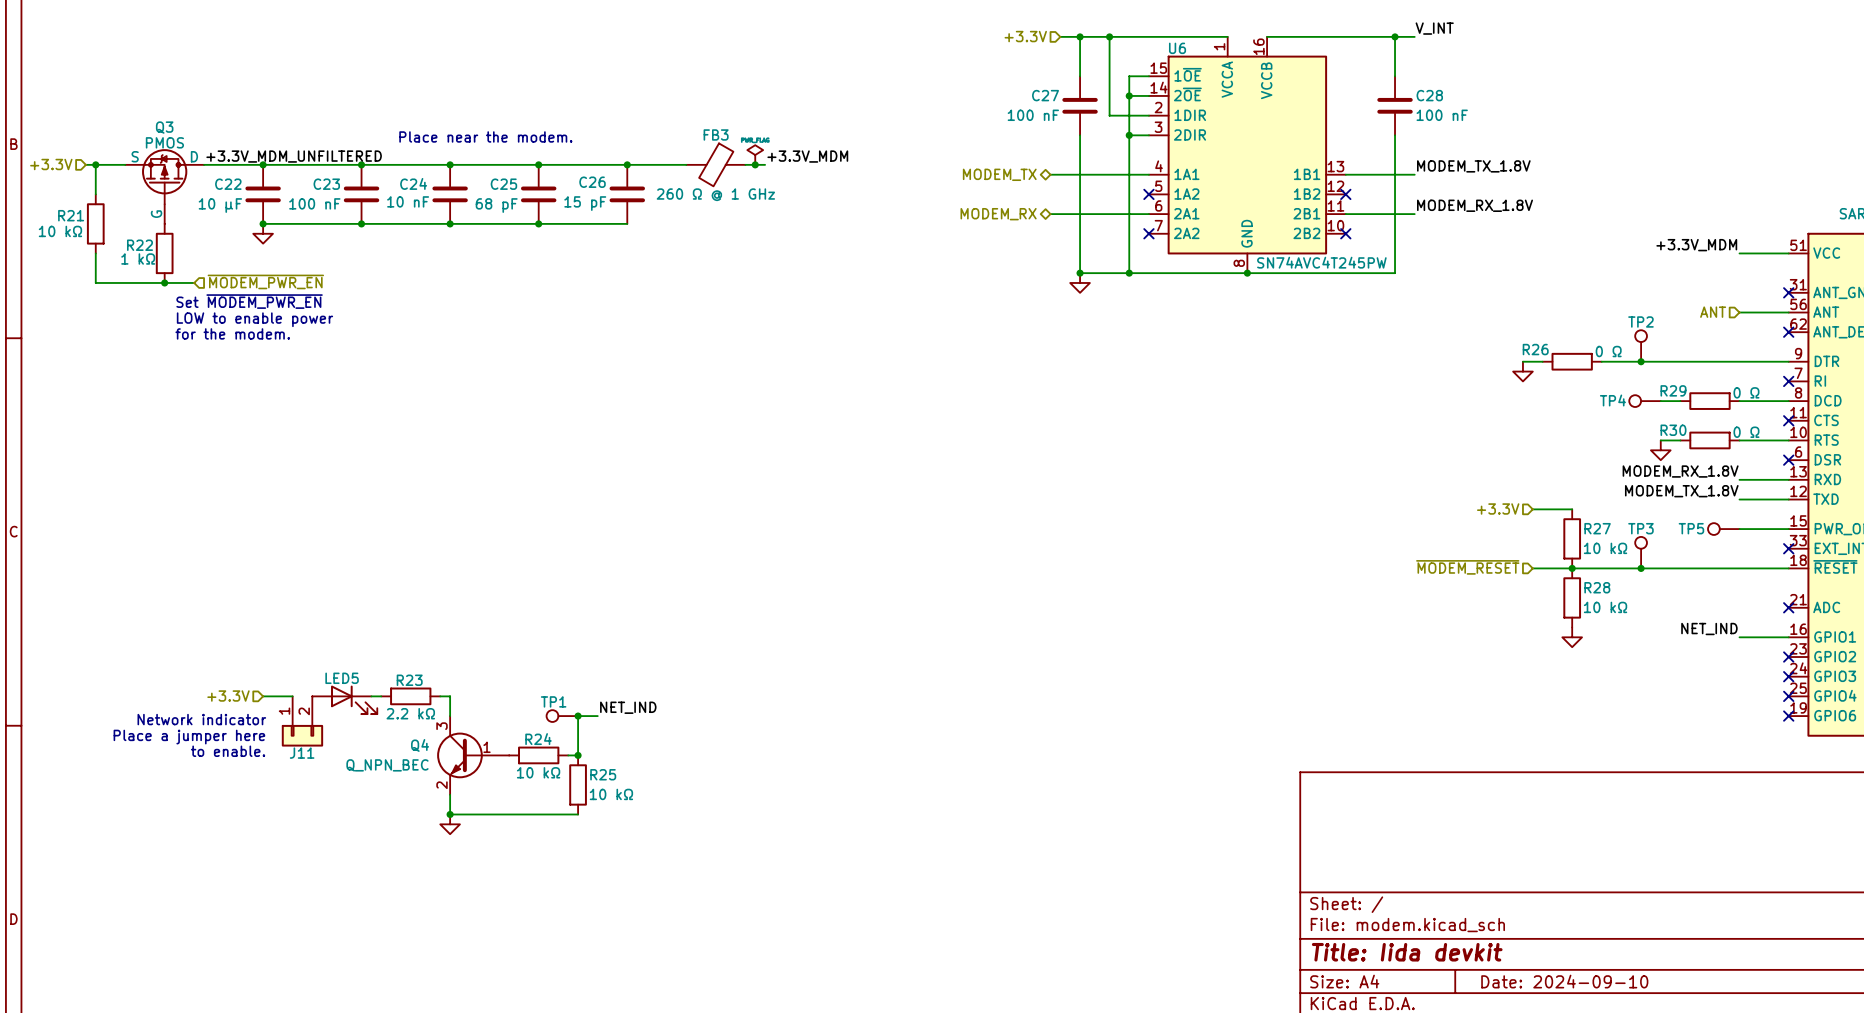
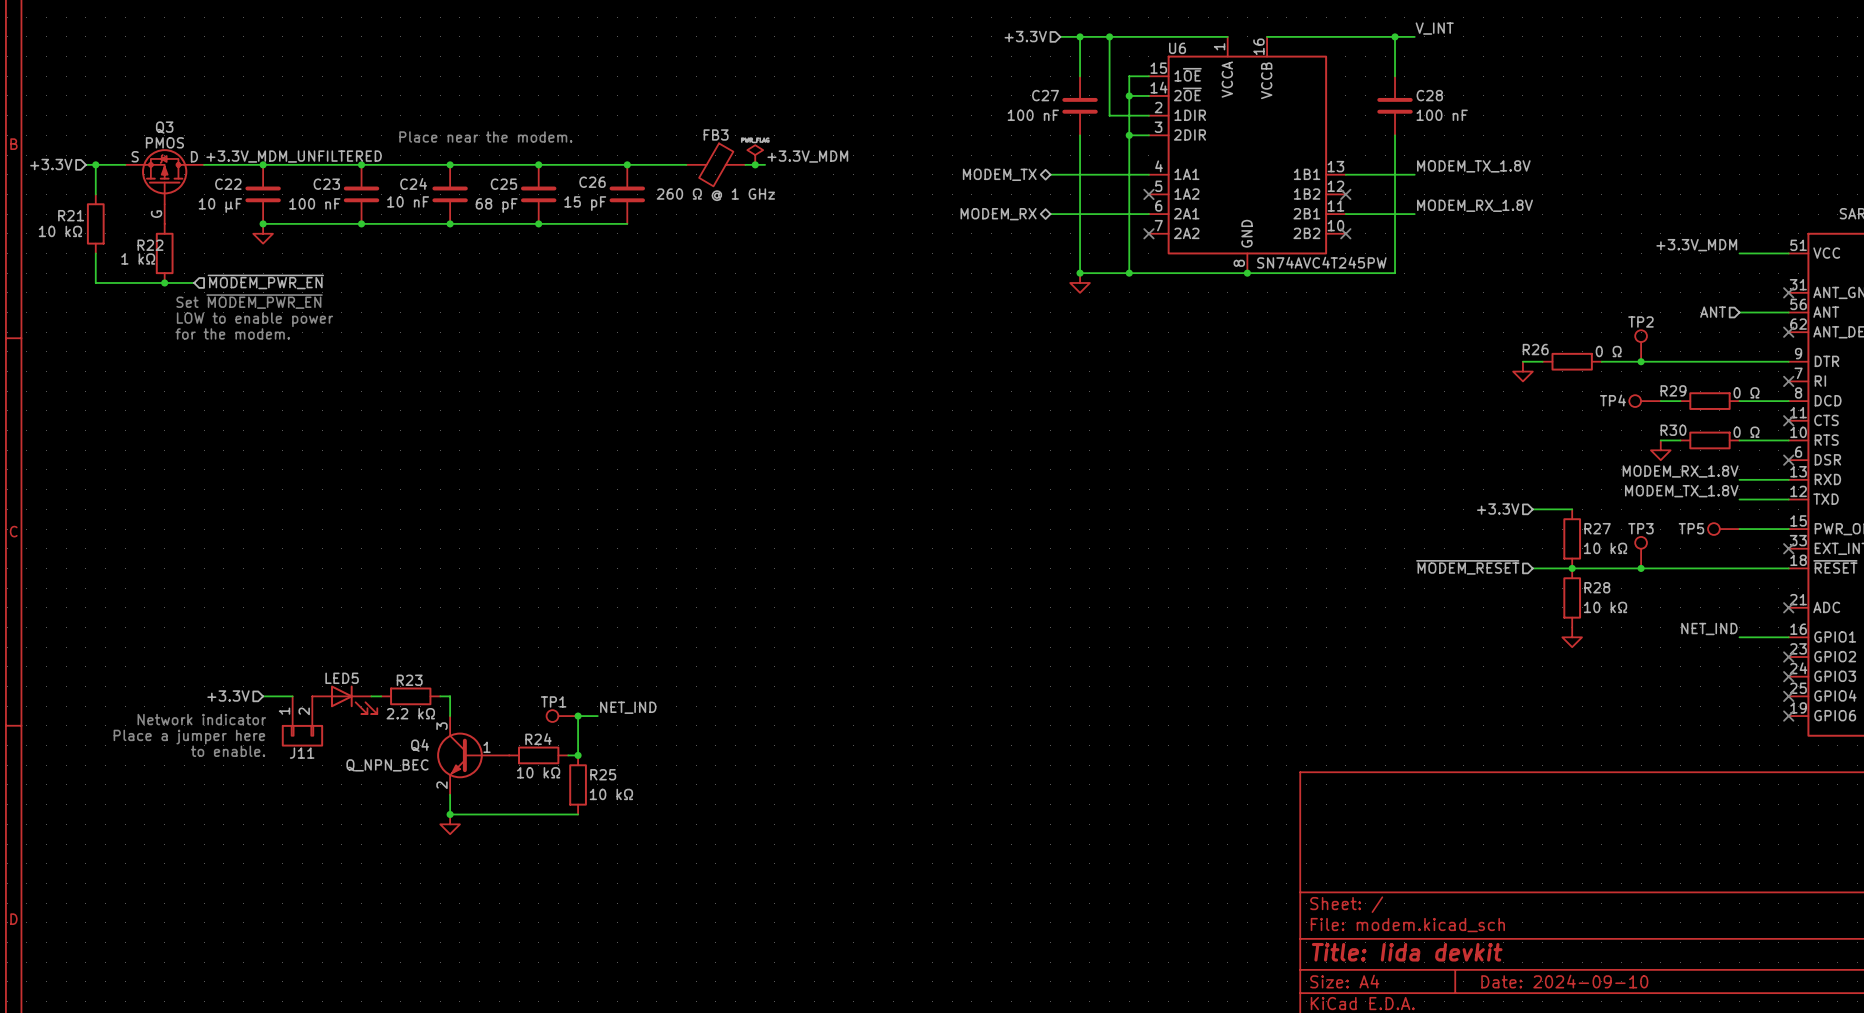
R22 name position: R22 (139, 245) -> R22 (150, 245)

